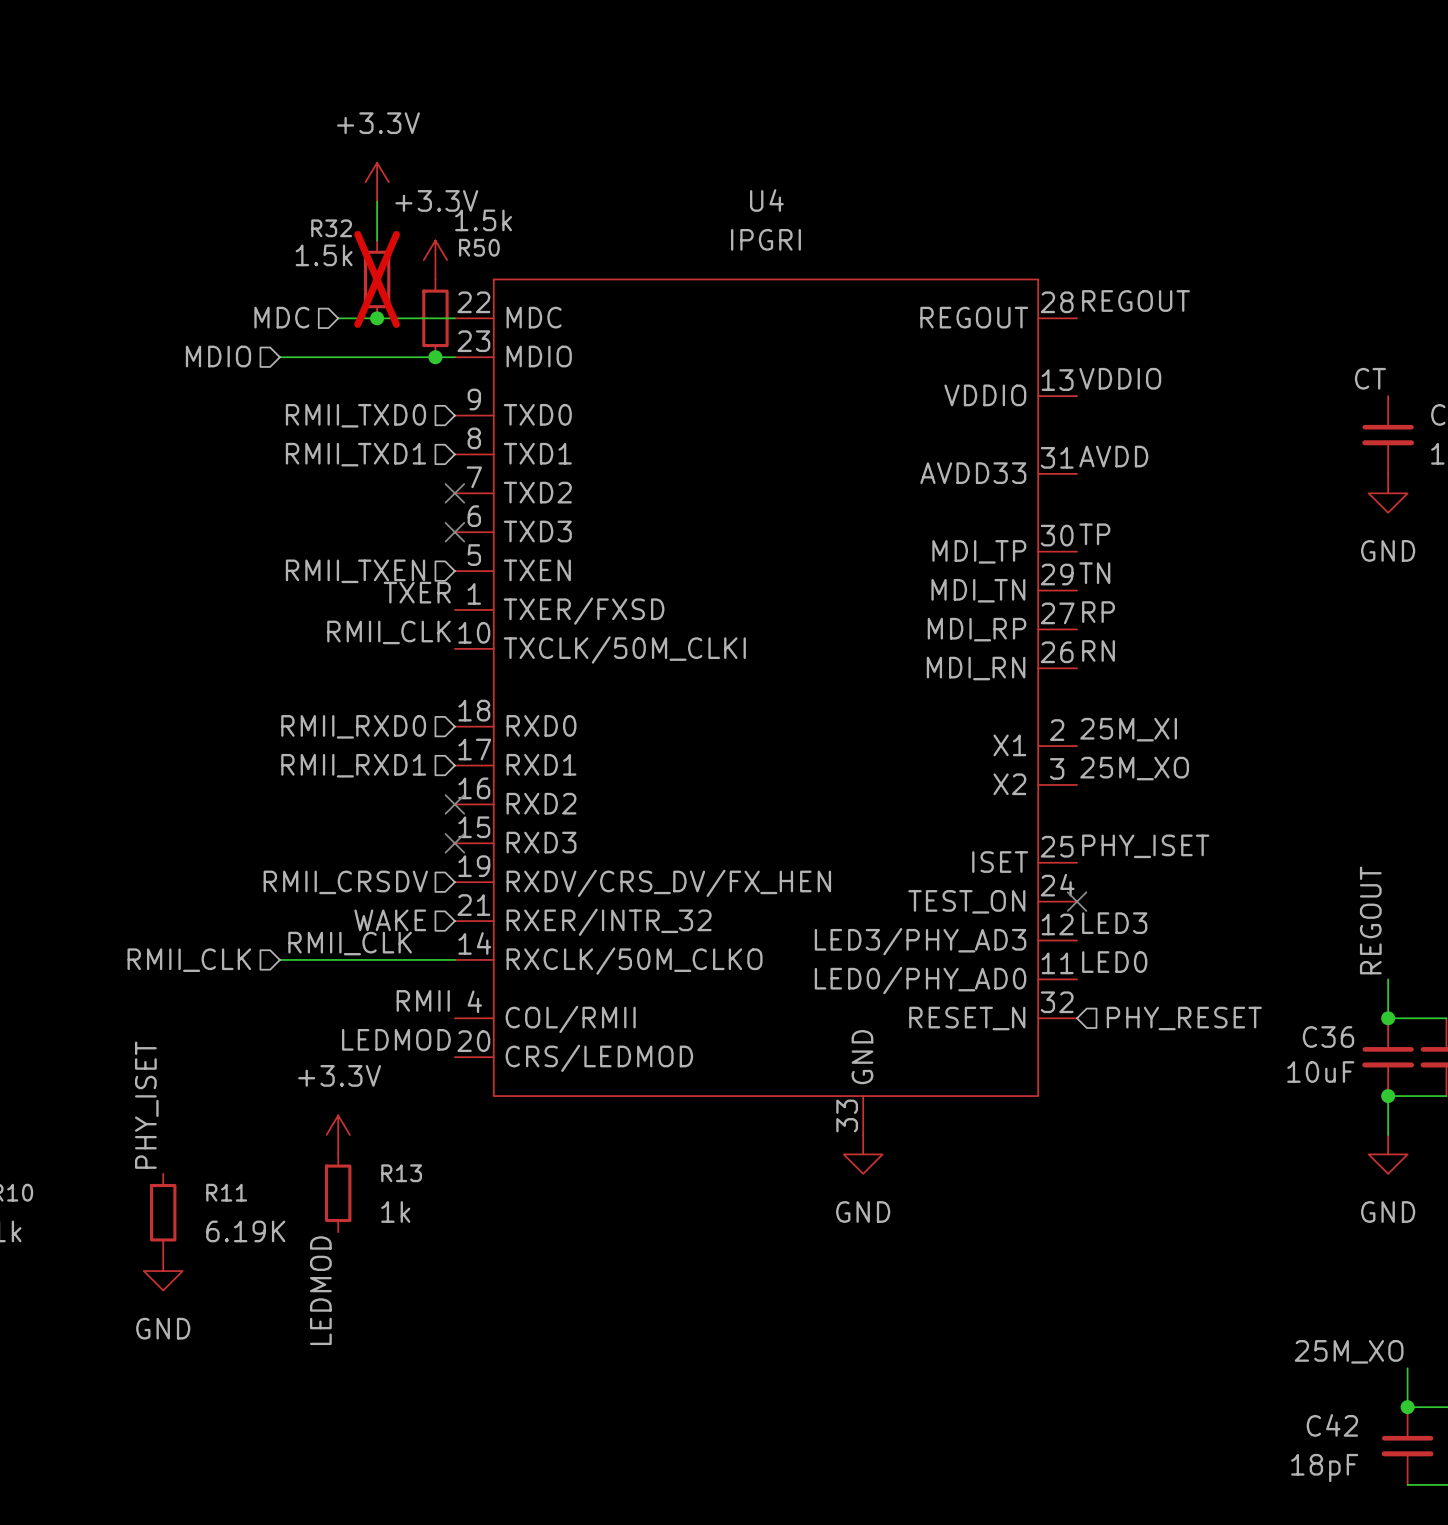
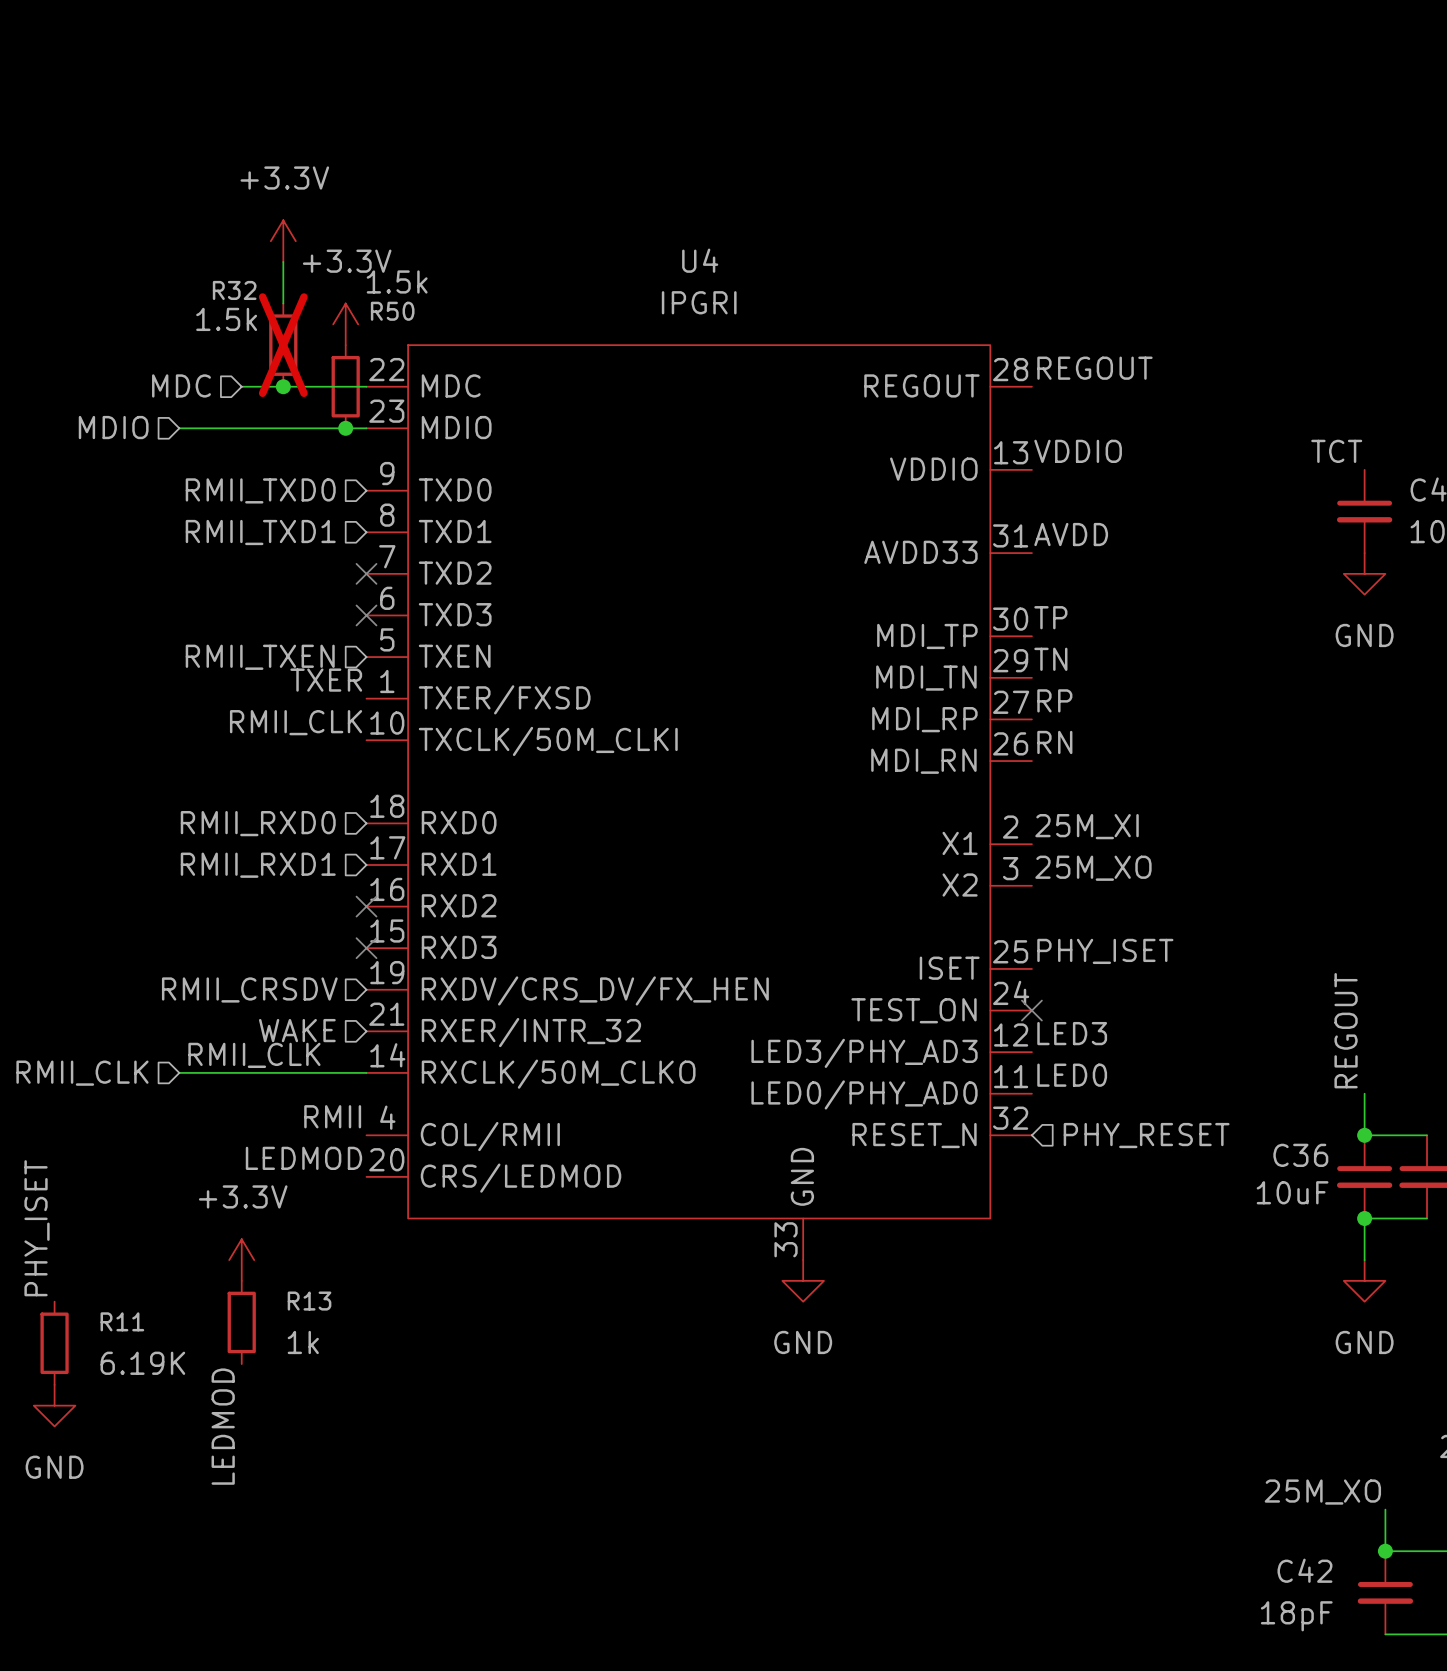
label: CT (1370, 378) -> TCT (1336, 451)

